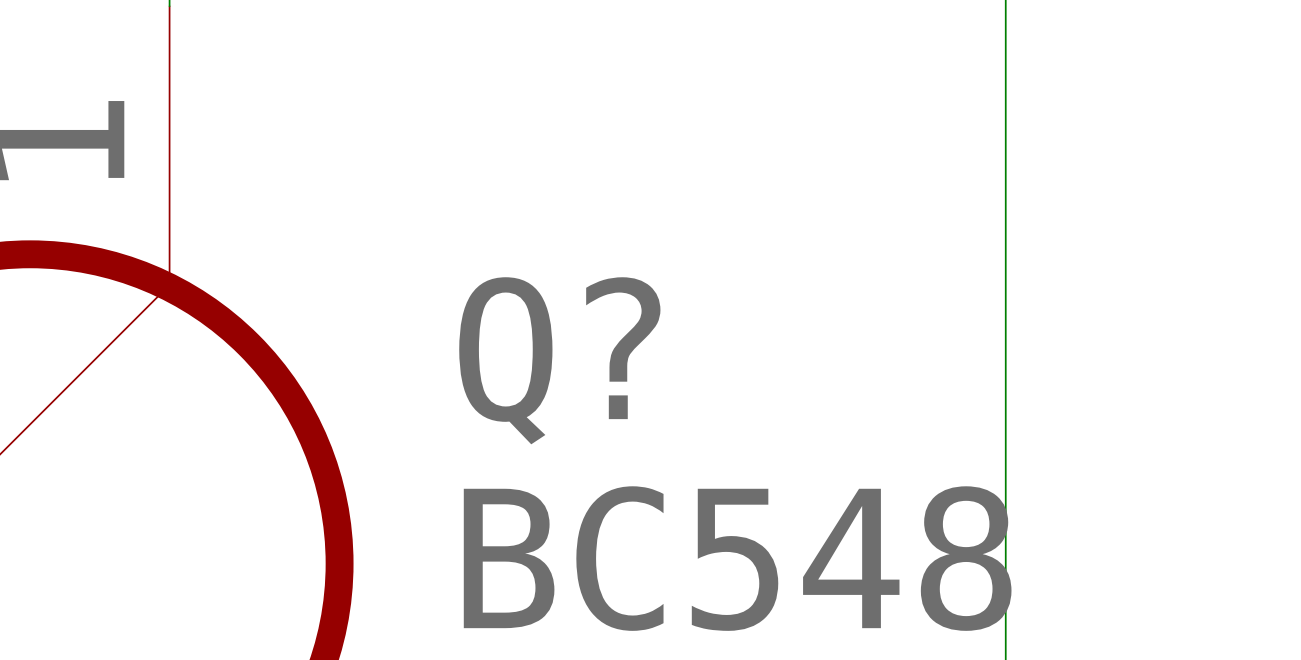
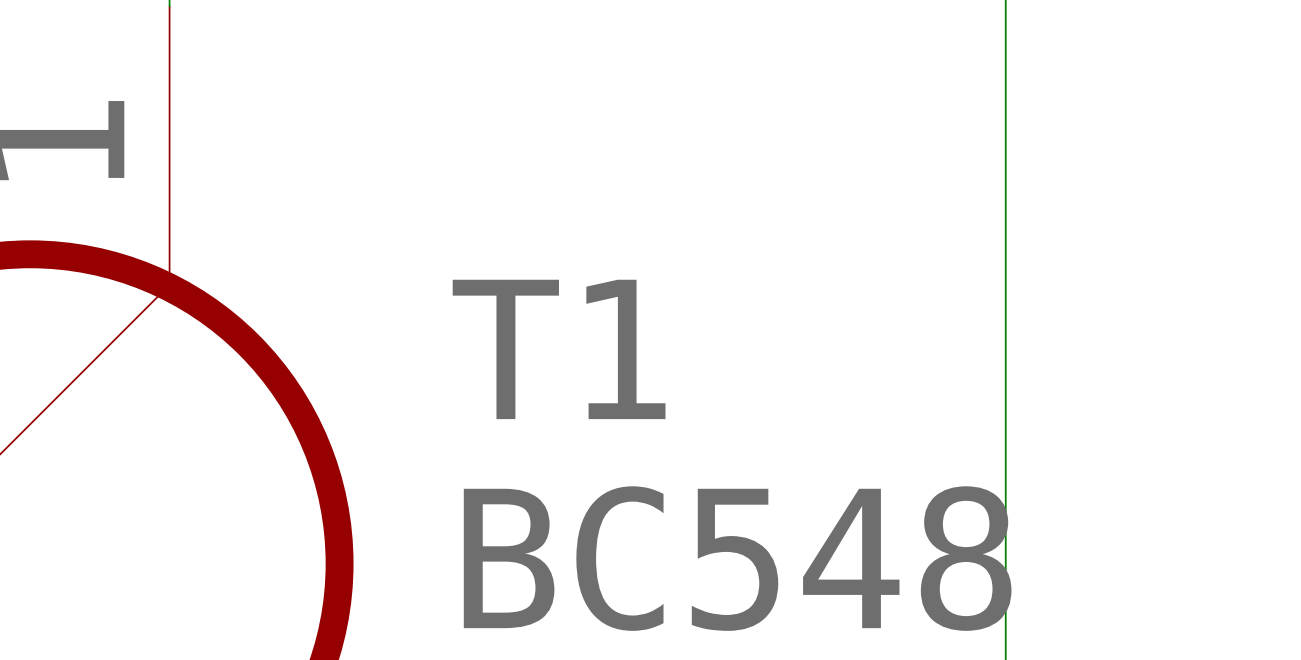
Q? name: Q? (559, 360) -> T1 (559, 349)

